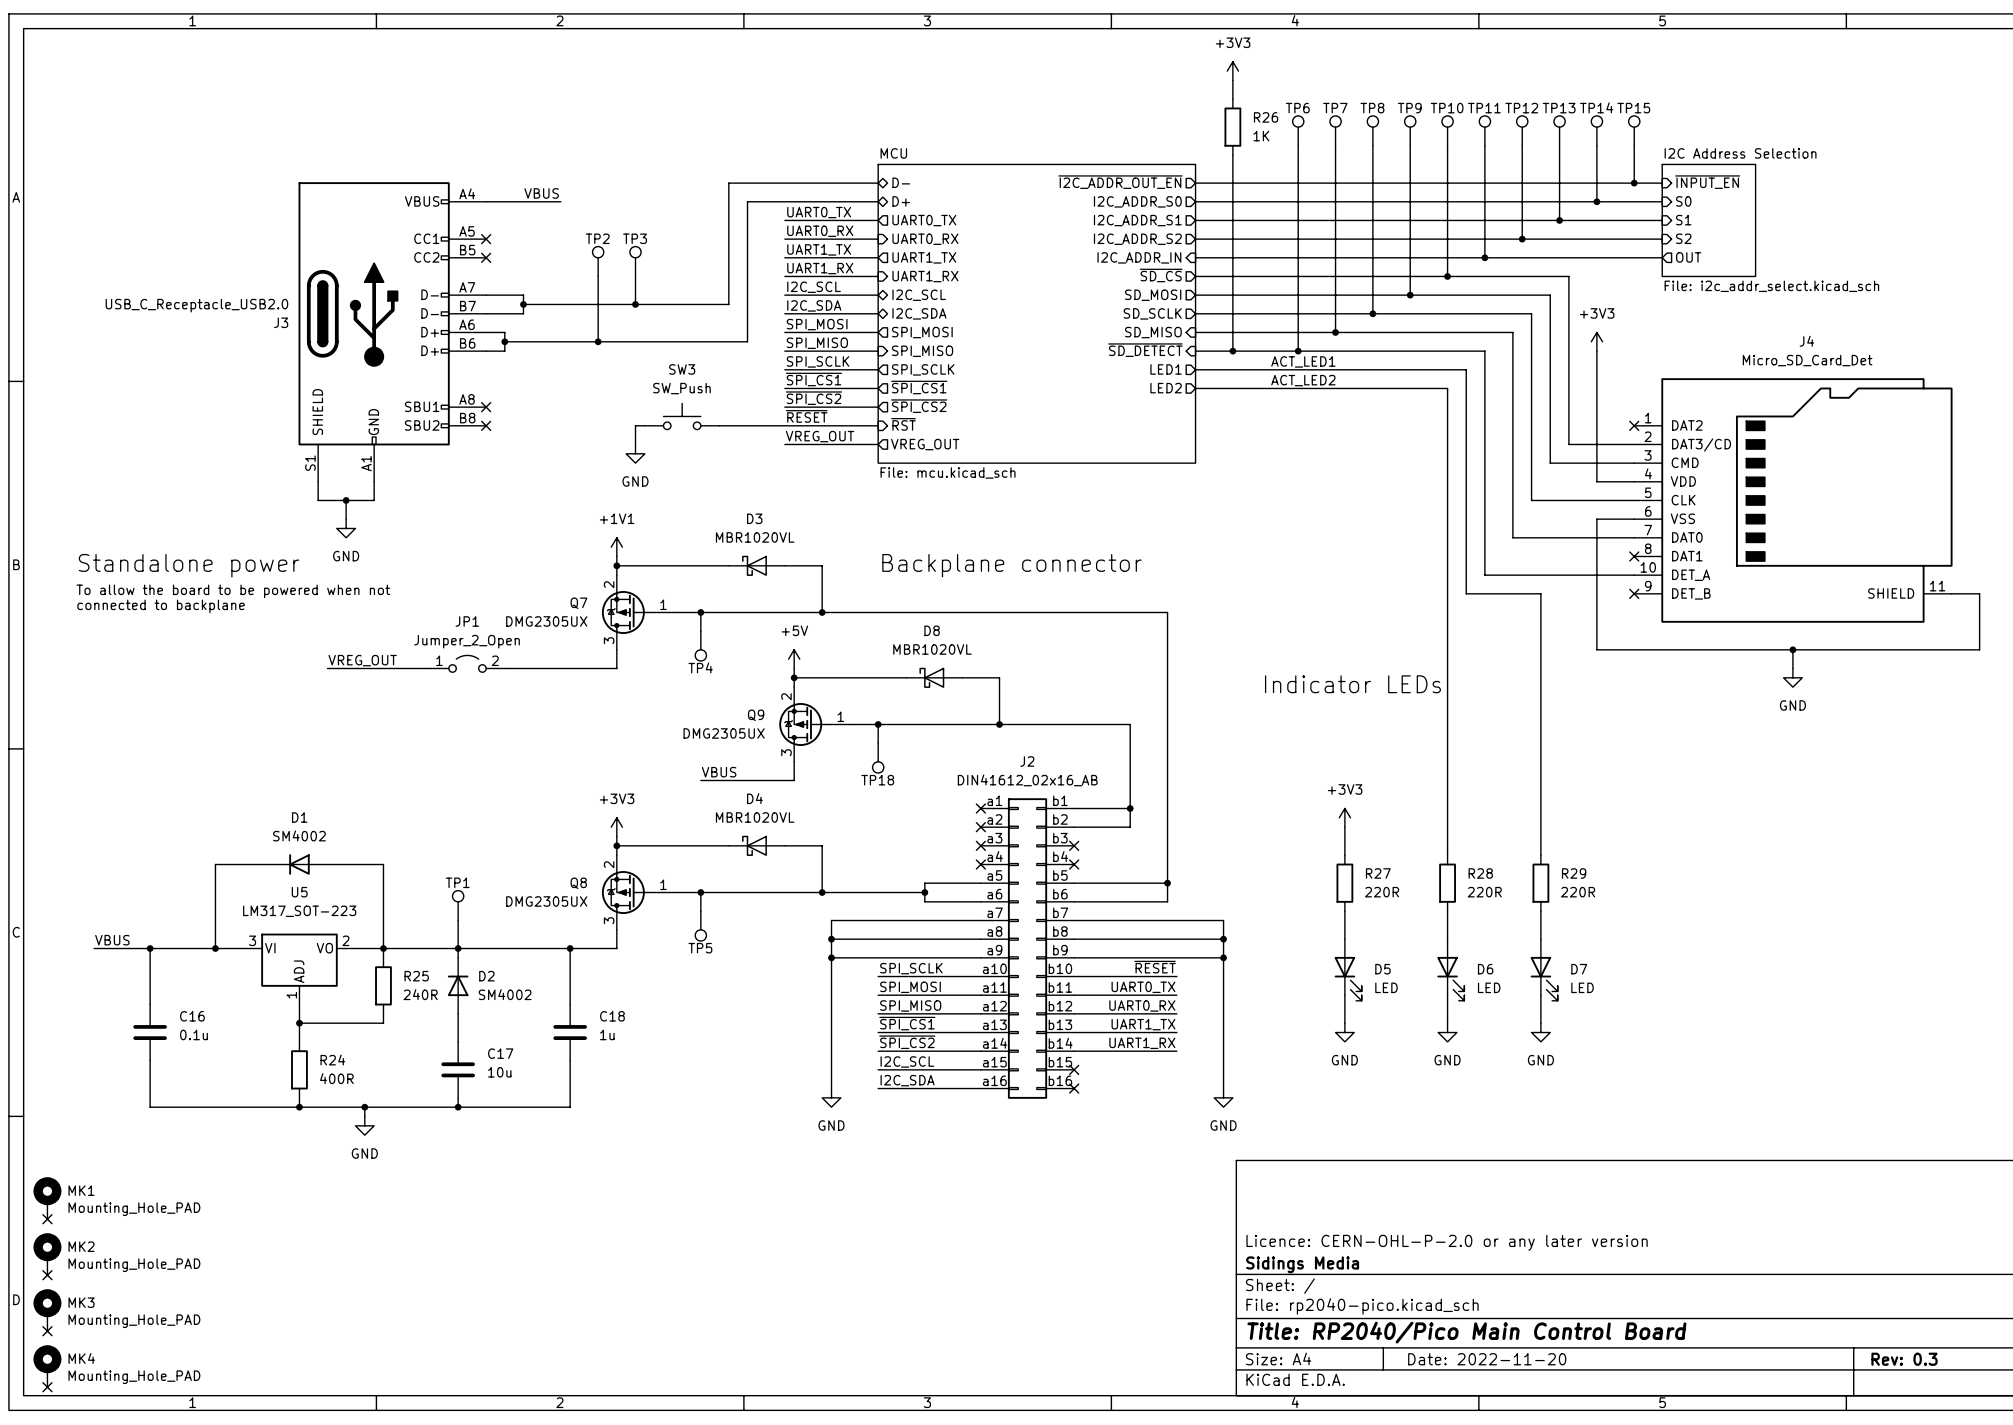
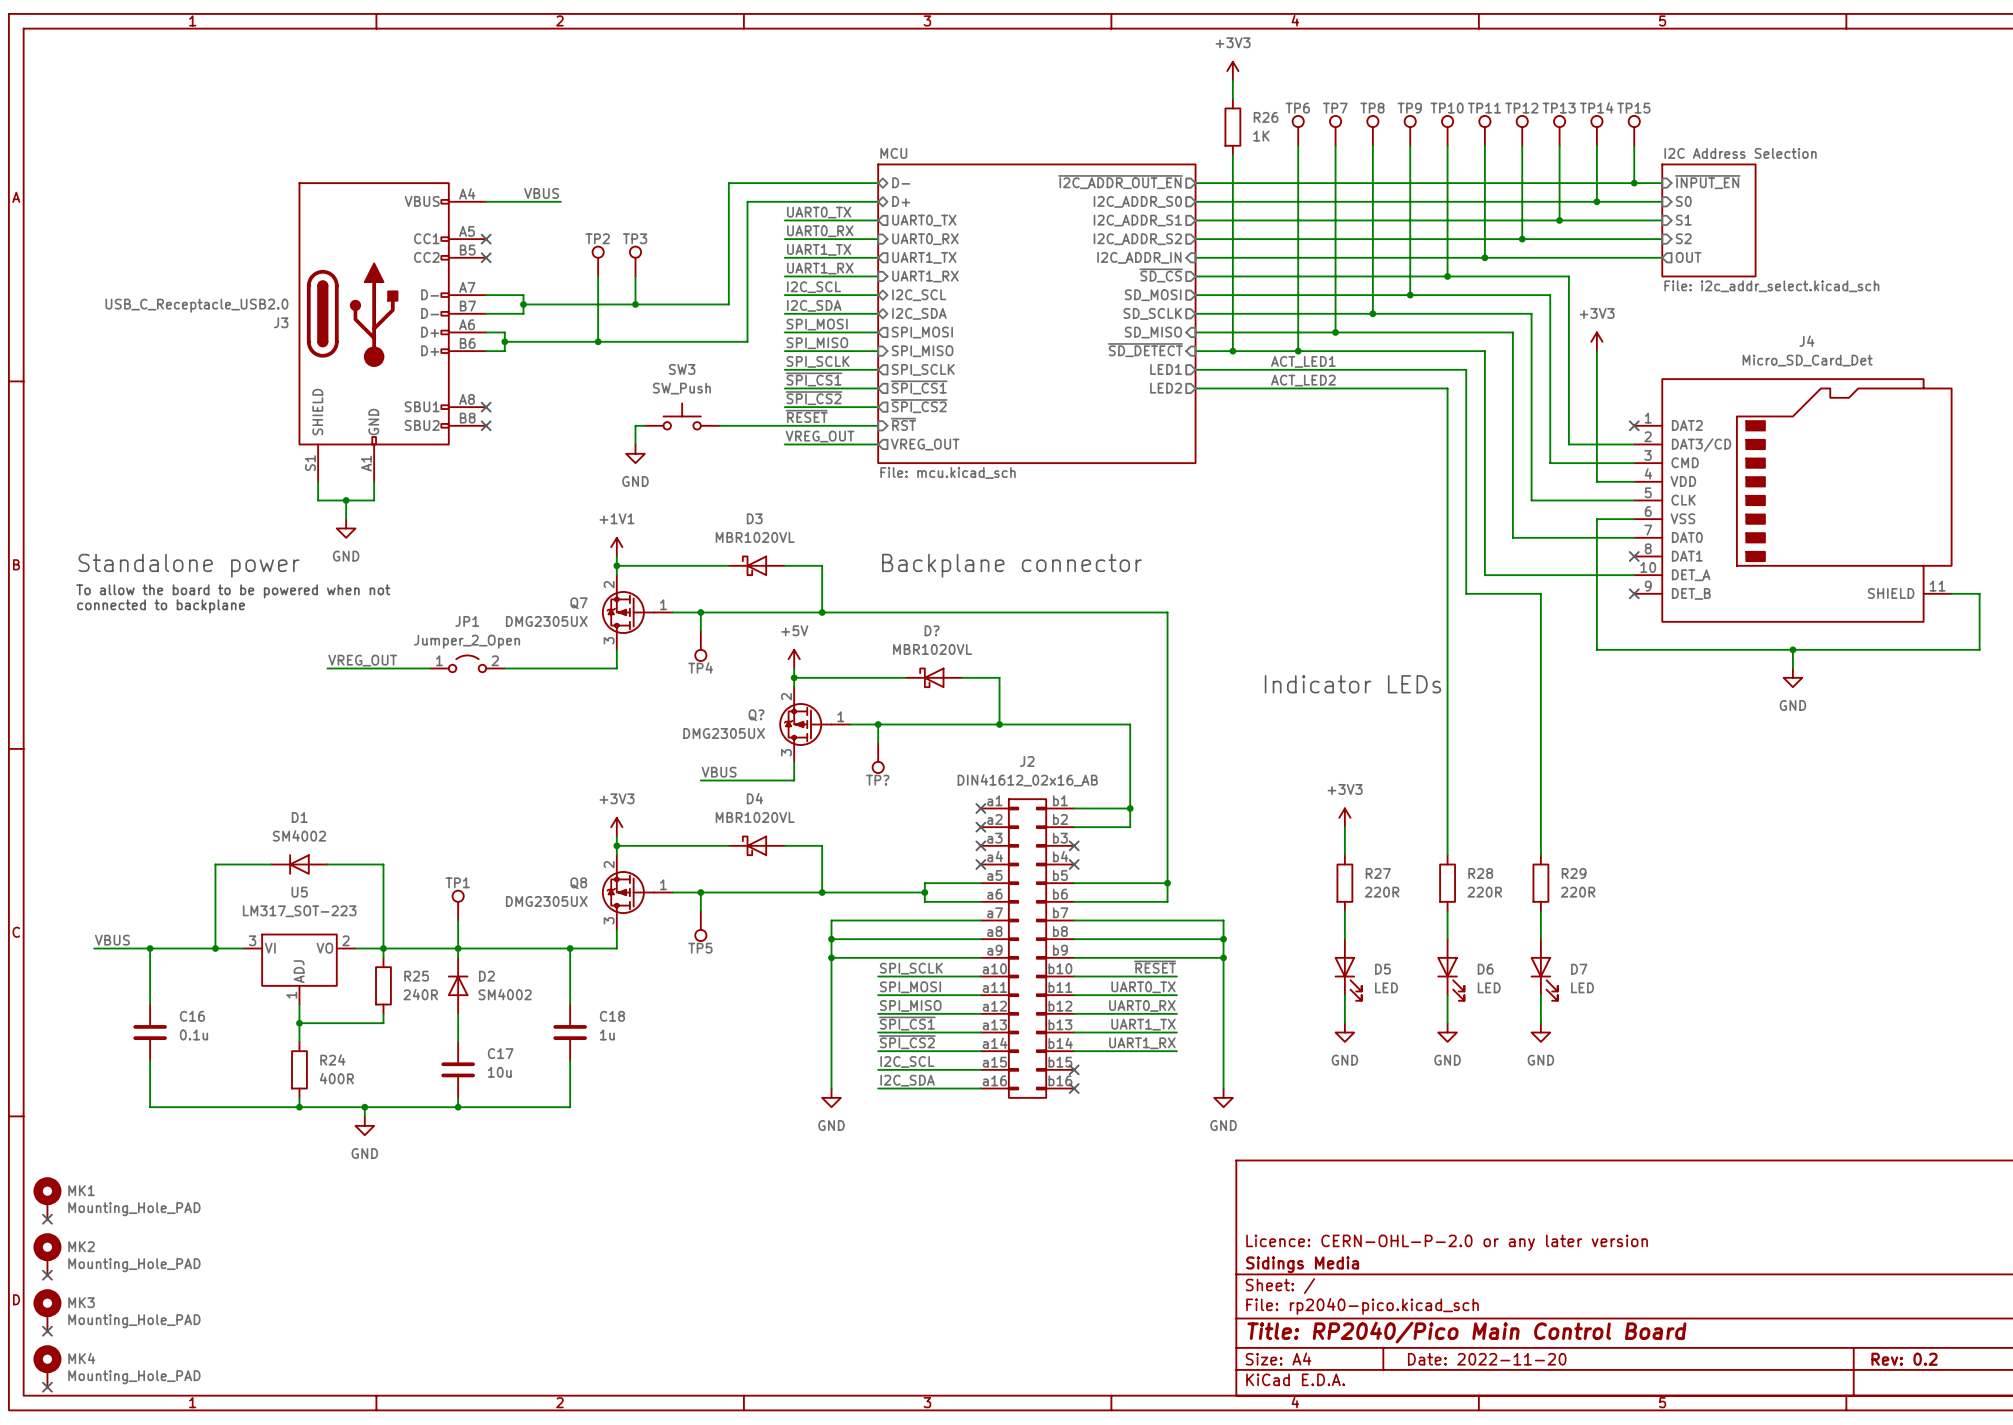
D8 name: D8 (932, 630) -> D? (932, 630)
Q9 name: Q9 (756, 715) -> Q? (756, 715)
TP18 name: TP18 (877, 780) -> TP? (877, 780)
title block: Rev: 0.3 (1904, 1359) -> Rev: 0.2 (1904, 1359)

